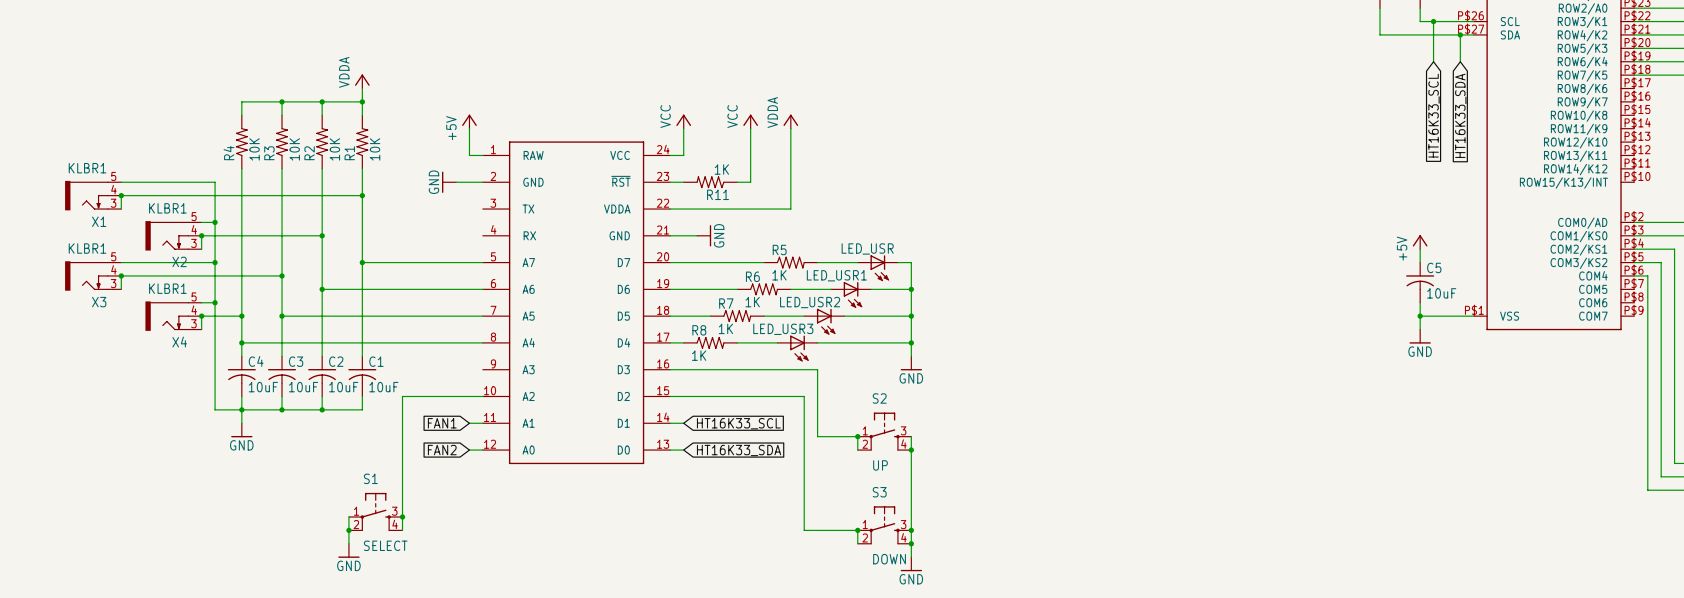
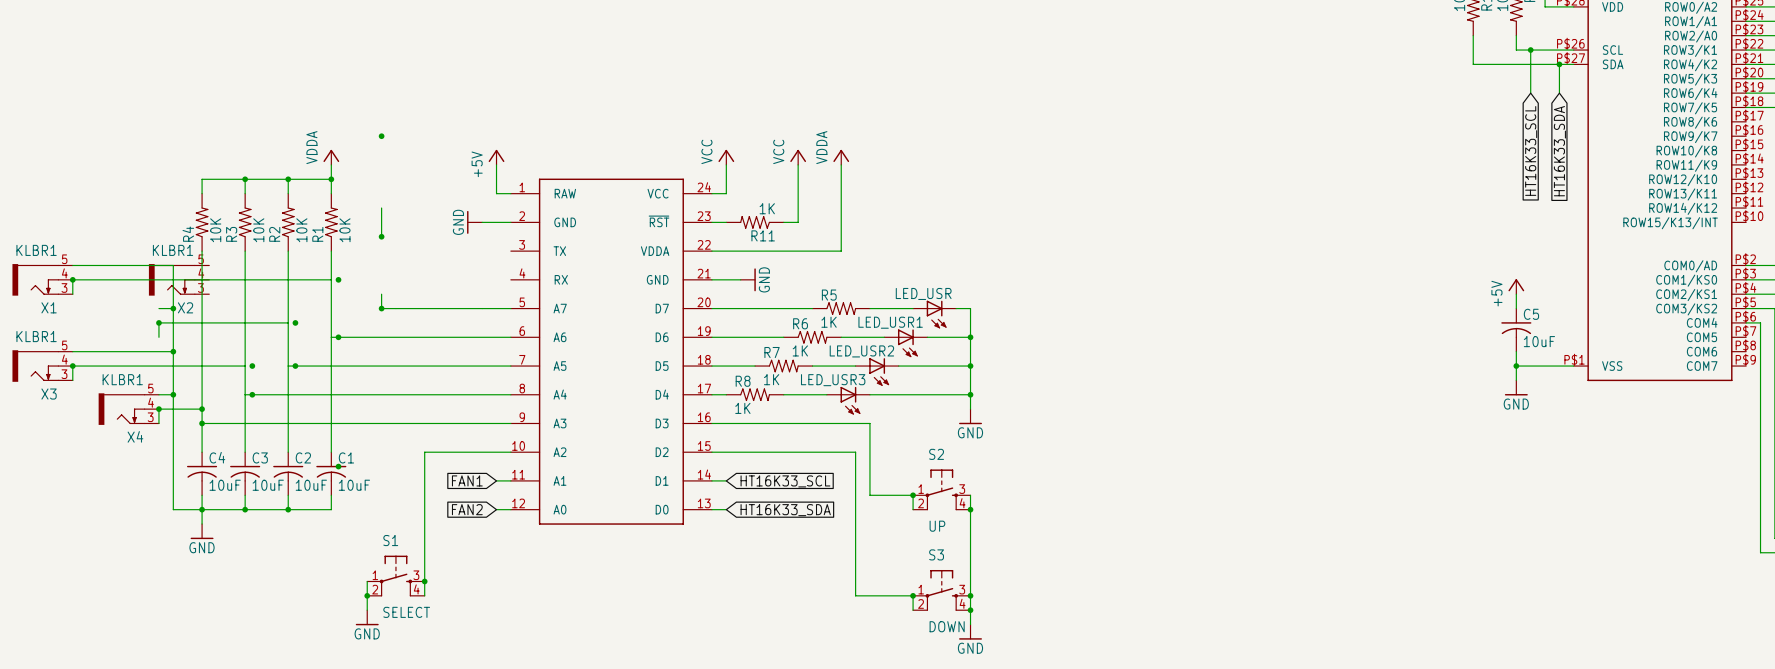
power symbol position: VDDA (362, 81) -> VDDA (331, 157)
wire: (362, 88) (362, 115) -> (331, 164) (331, 193)
wire: (282, 101) (282, 115) -> (245, 179) (245, 193)
junction: (282, 101) -> none
wire: (322, 101) (322, 115) -> (288, 179) (288, 193)
junction: (322, 101) -> none
wire: (362, 101) (241, 101) (241, 115) -> (331, 179) (202, 179) (202, 193)
junction: none -> (245, 179)
R4 position: (241, 142) -> (202, 222)
junction: none -> (288, 179)
R3 position: (282, 142) -> (245, 222)
junction: none -> (331, 179)
R2 position: (322, 142) -> (288, 222)
R1 position: (362, 142) -> (331, 222)
wire: (241, 168) (241, 356) -> (202, 251) (202, 452)
wire: (282, 168) (282, 356) -> (245, 251) (245, 452)
wire: (322, 168) (322, 356) -> (288, 251) (288, 452)
wire: (121, 182) (215, 182) (215, 409) (362, 409) (362, 396) -> (72, 265) (173, 265) (173, 509) (331, 509) (331, 495)
X1 position: (93, 195) -> (42, 279)
junction: (121, 195) -> none
wire: (121, 209) (121, 195) (362, 195) (362, 249) -> none
wire: none -> (331, 251) (331, 452)
wire: (201, 222) (215, 222) -> none
junction: (215, 222) -> none
junction: none -> (72, 279)
wire: (201, 235) (201, 249) -> (209, 279) (72, 279) (72, 294)
junction: (201, 235) -> none
wire: (121, 262) (154, 262) -> none
wire: (168, 262) (215, 262) -> none
junction: none -> (173, 308)
junction: (215, 262) -> none
wire: (362, 262) (362, 356) -> none
X3 position: (93, 275) -> (42, 366)
junction: (121, 275) -> none
wire: (154, 275) (121, 275) (121, 289) -> (158, 322) (158, 337)
junction: none -> (158, 322)
wire: none -> (72, 351) (173, 351)
junction: none -> (173, 351)
wire: (201, 302) (215, 302) -> (158, 394) (173, 394)
junction: (215, 302) -> none
junction: none -> (72, 366)
X4 position: (173, 316) -> (128, 409)
wire: (201, 316) (201, 329) -> (209, 366) (72, 366) (72, 380)
junction: (201, 316) -> none
junction: none -> (173, 394)
junction: none -> (158, 409)
wire: none -> (202, 409) (158, 409) (158, 423)
junction: none -> (202, 409)
wire: none -> (202, 423) (510, 423)
junction: none -> (202, 423)
C4 position: (241, 376) -> (202, 473)
C3 position: (282, 376) -> (245, 473)
C2 position: (322, 376) -> (288, 473)
C1 position: (362, 376) -> (331, 473)
wire: (241, 396) (241, 423) -> (202, 495) (202, 524)
wire: (282, 396) (282, 409) -> (245, 495) (245, 509)
wire: (322, 396) (322, 409) -> (288, 495) (288, 509)
junction: (241, 409) -> none
junction: (282, 409) -> none
power symbol position: GND (241, 430) -> GND (202, 531)
junction: none -> (202, 509)
junction: none -> (245, 509)
junction: none -> (288, 509)

